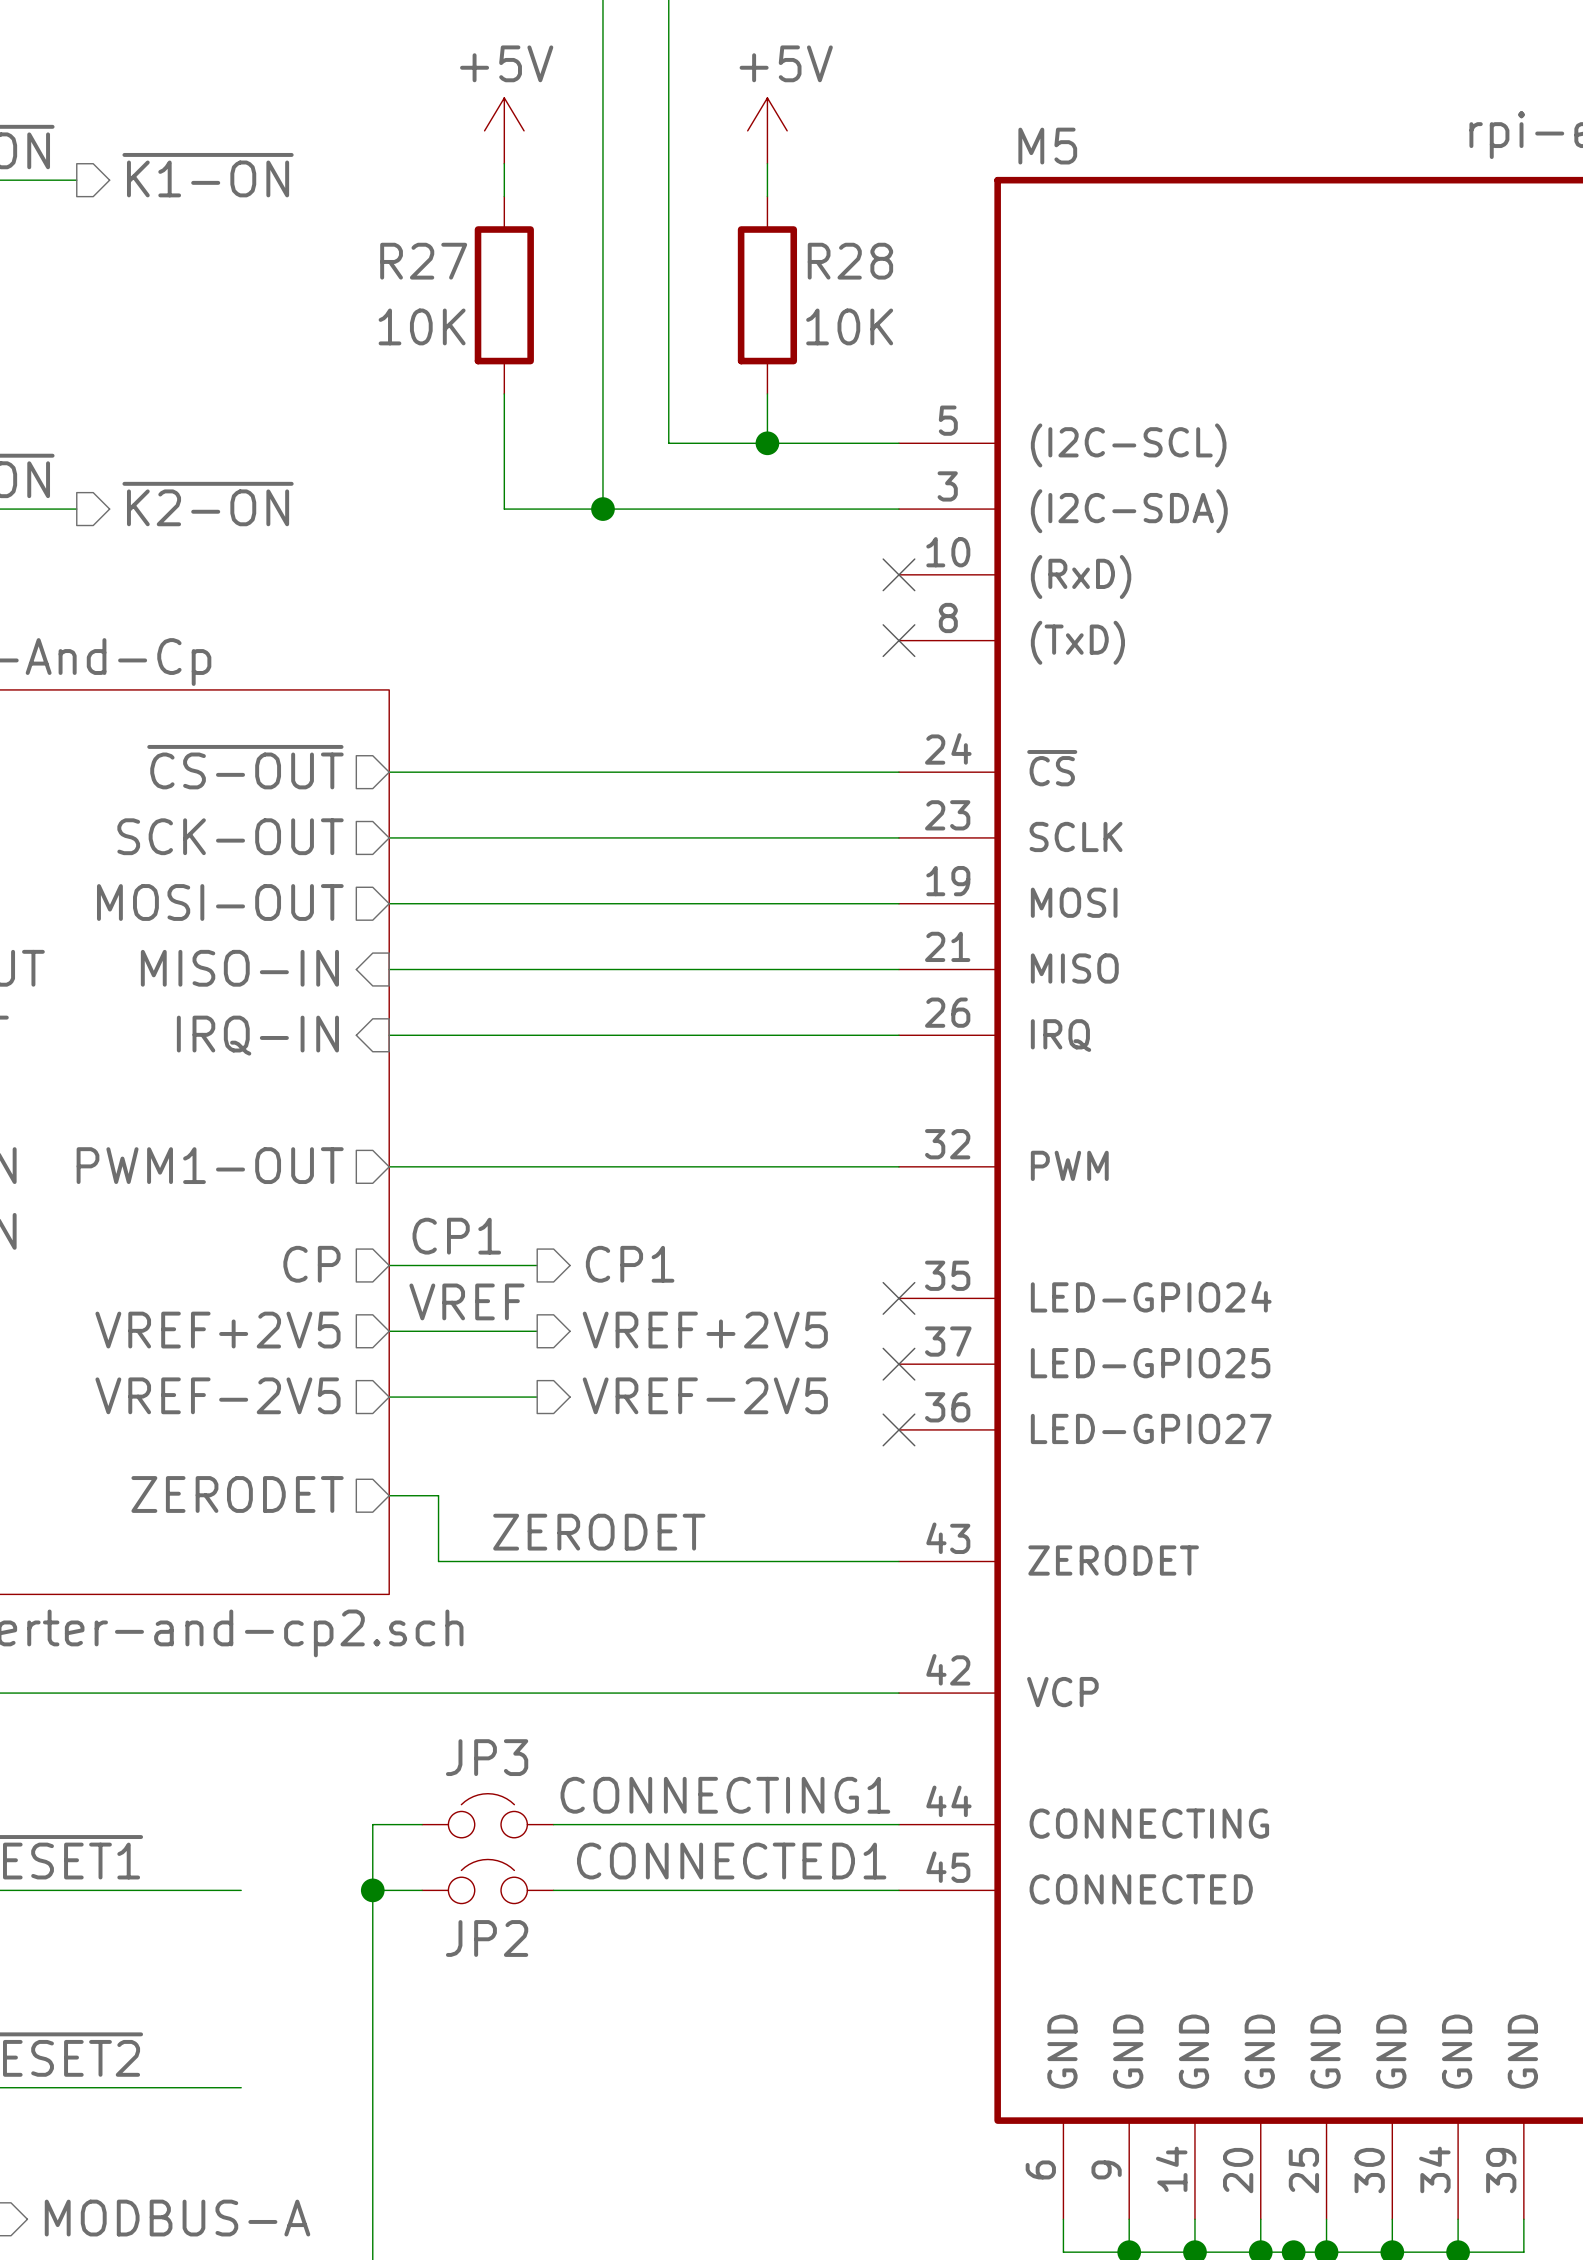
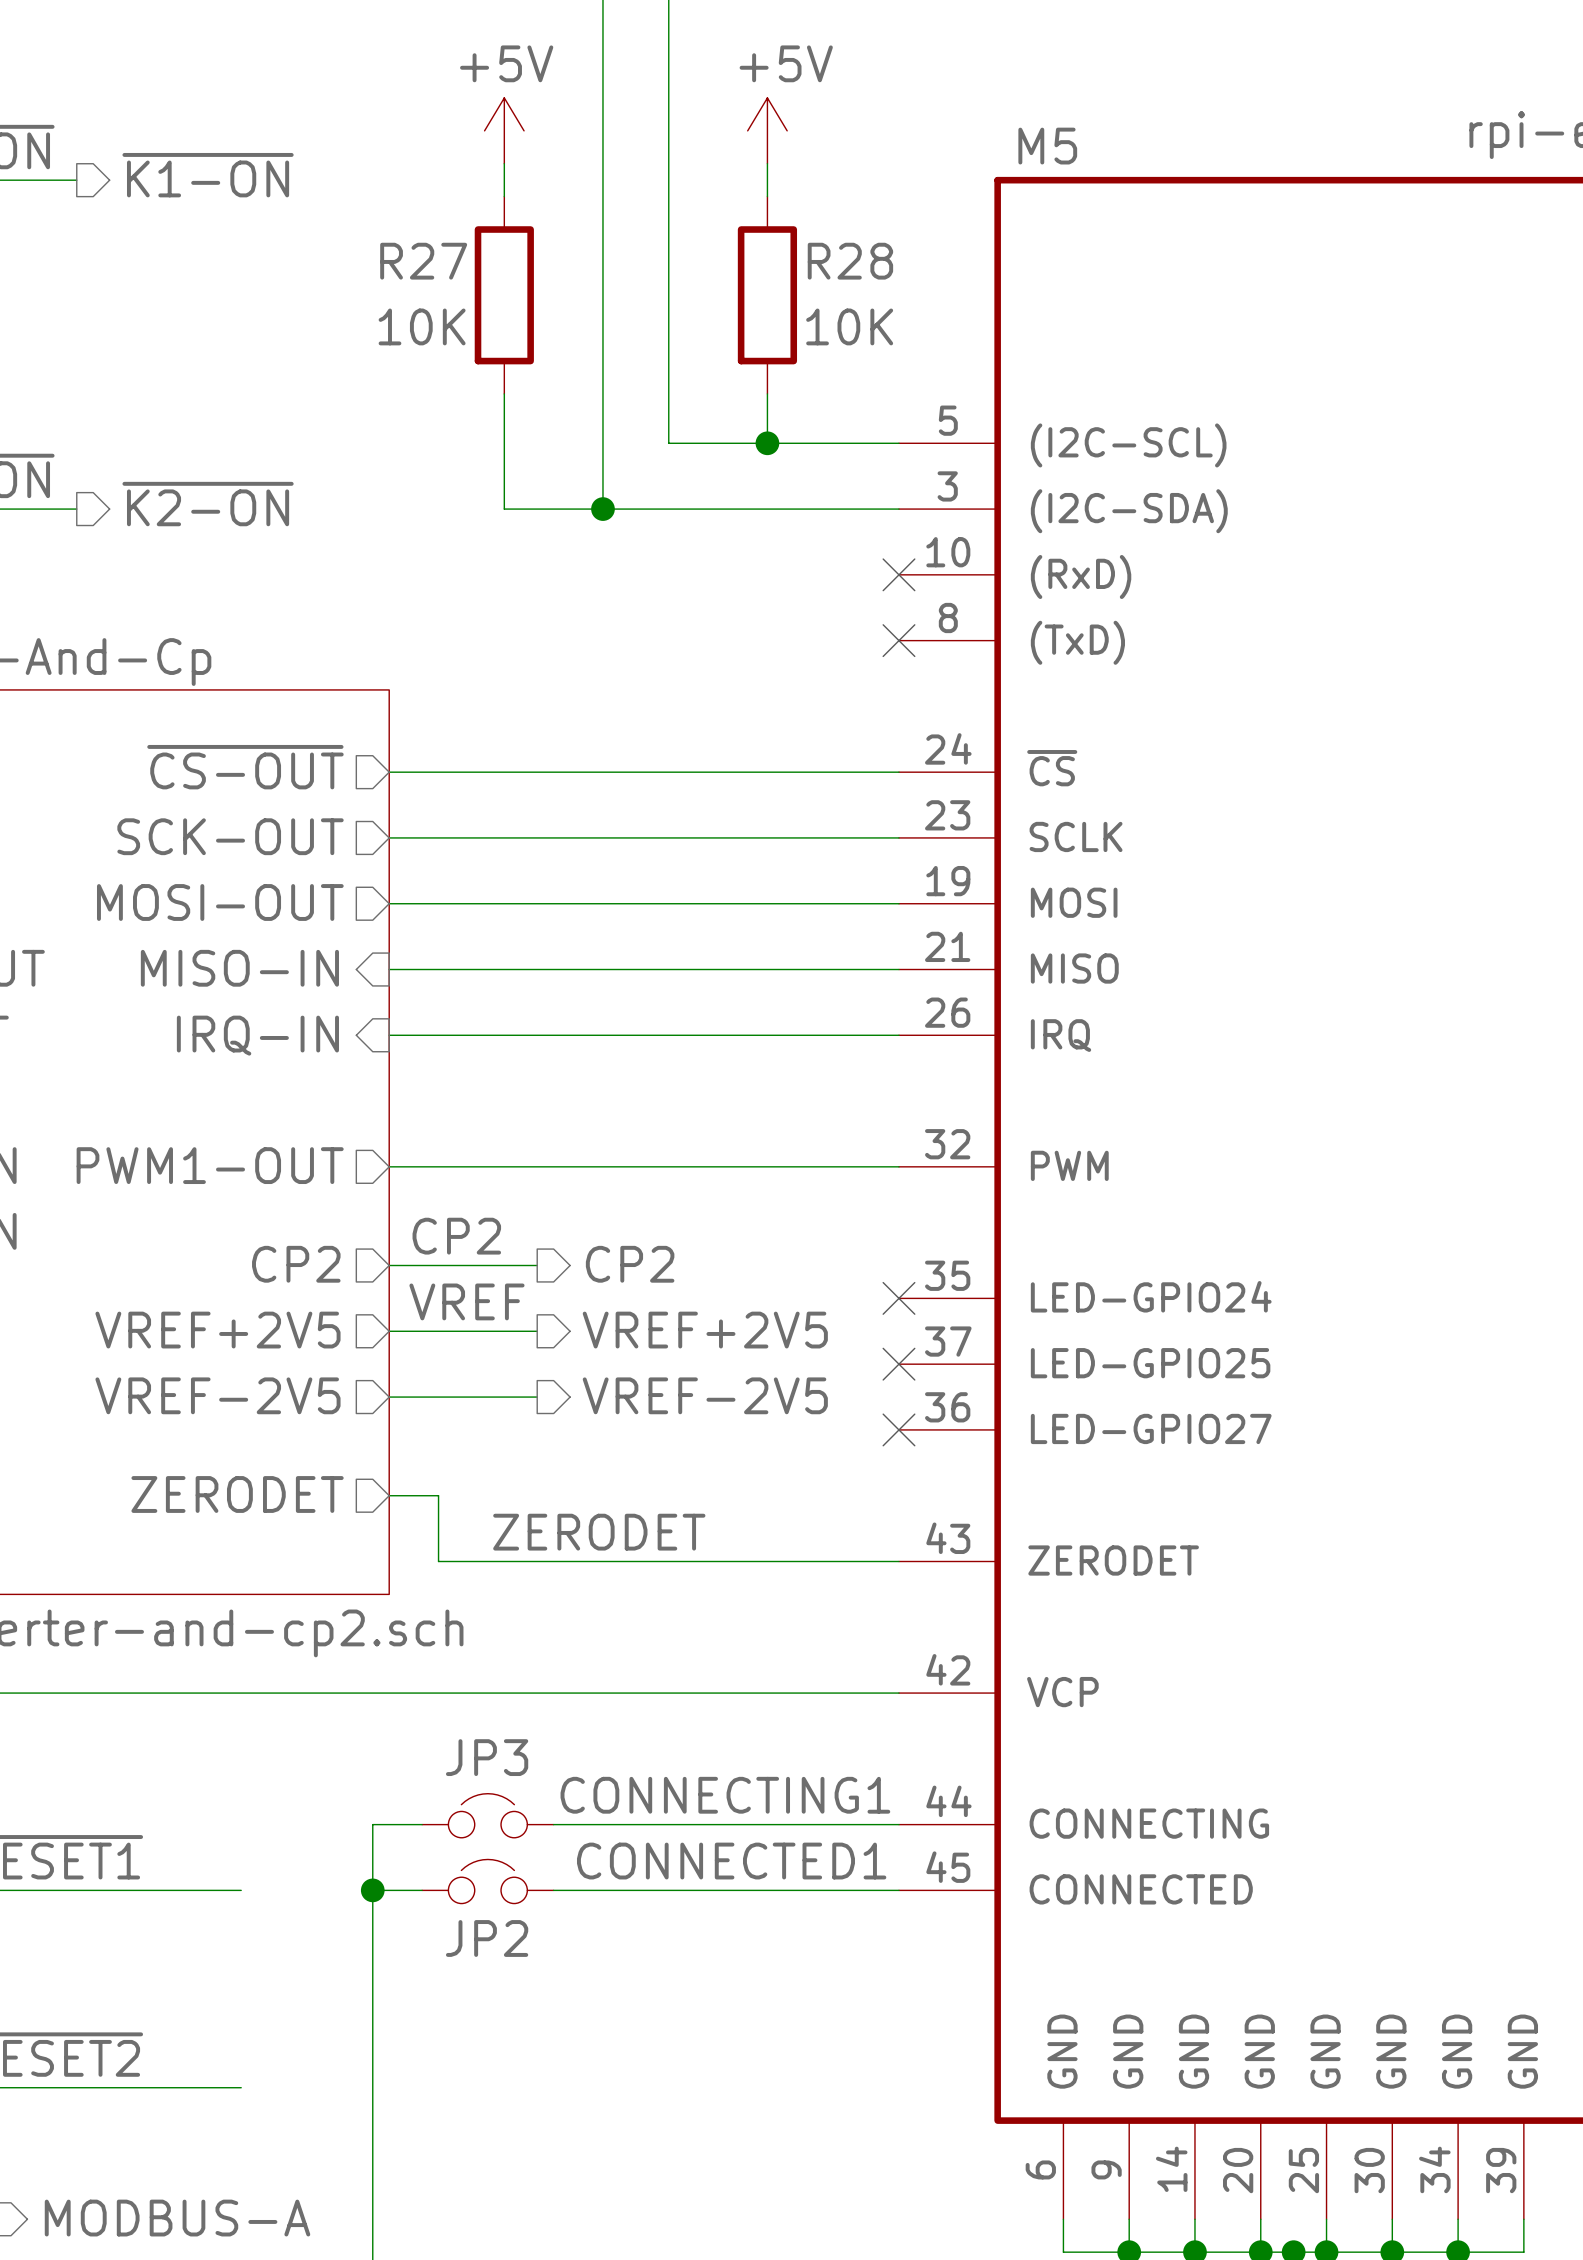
label: CP1 (456, 1236) -> CP2 (456, 1236)
sheet pin: CP (311, 1264) -> CP2 (296, 1264)
hierarchical label: CP1 (630, 1264) -> CP2 (630, 1264)

